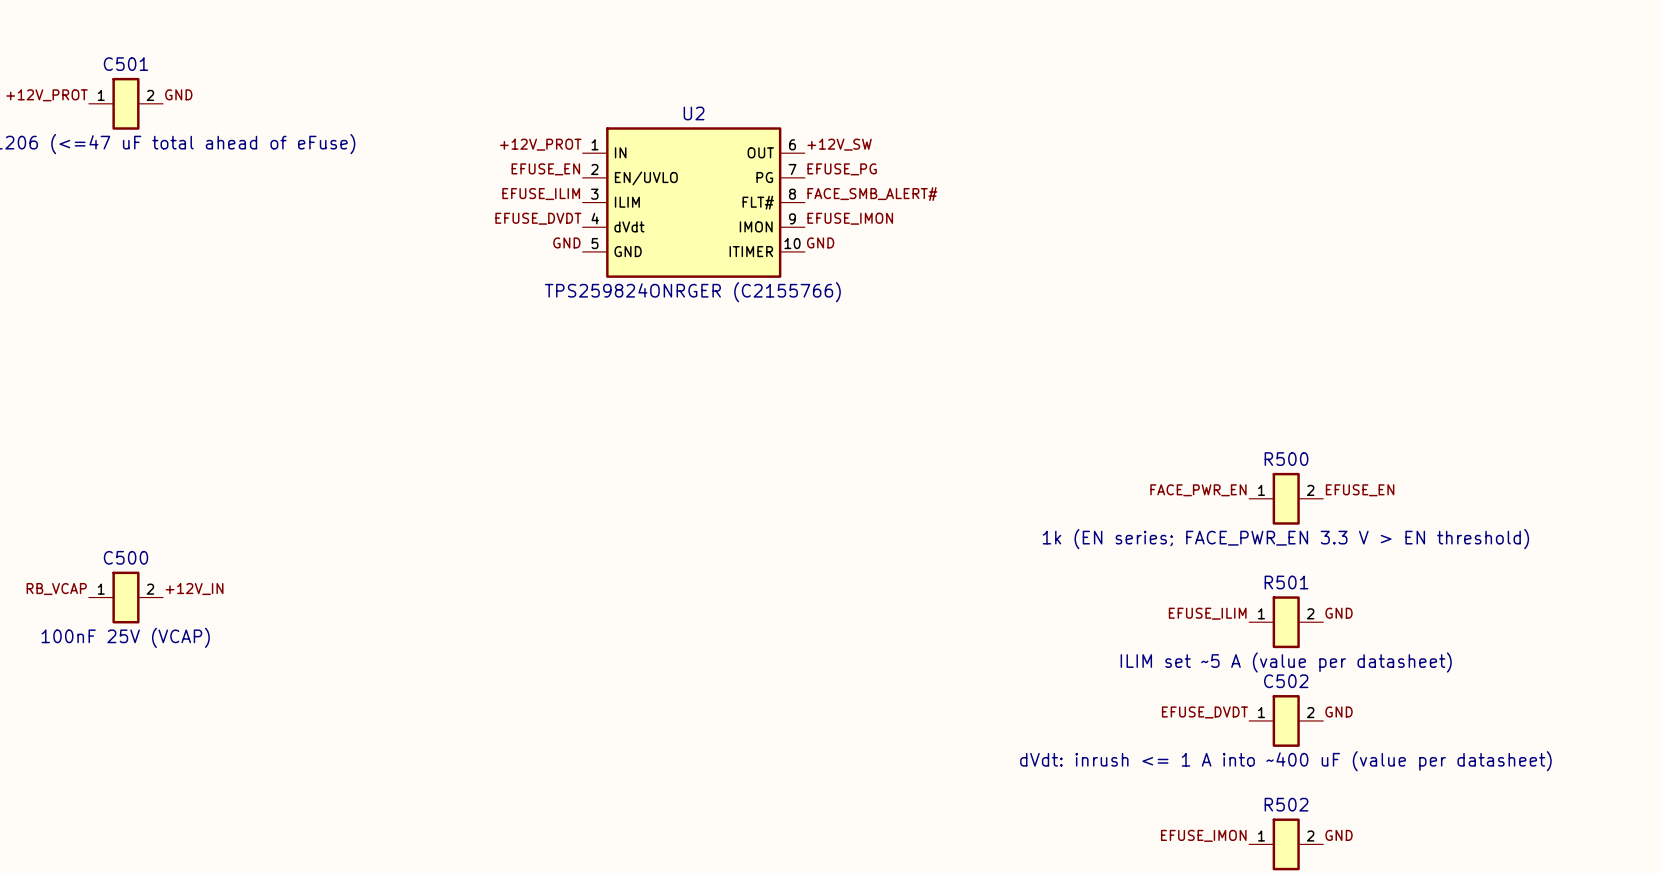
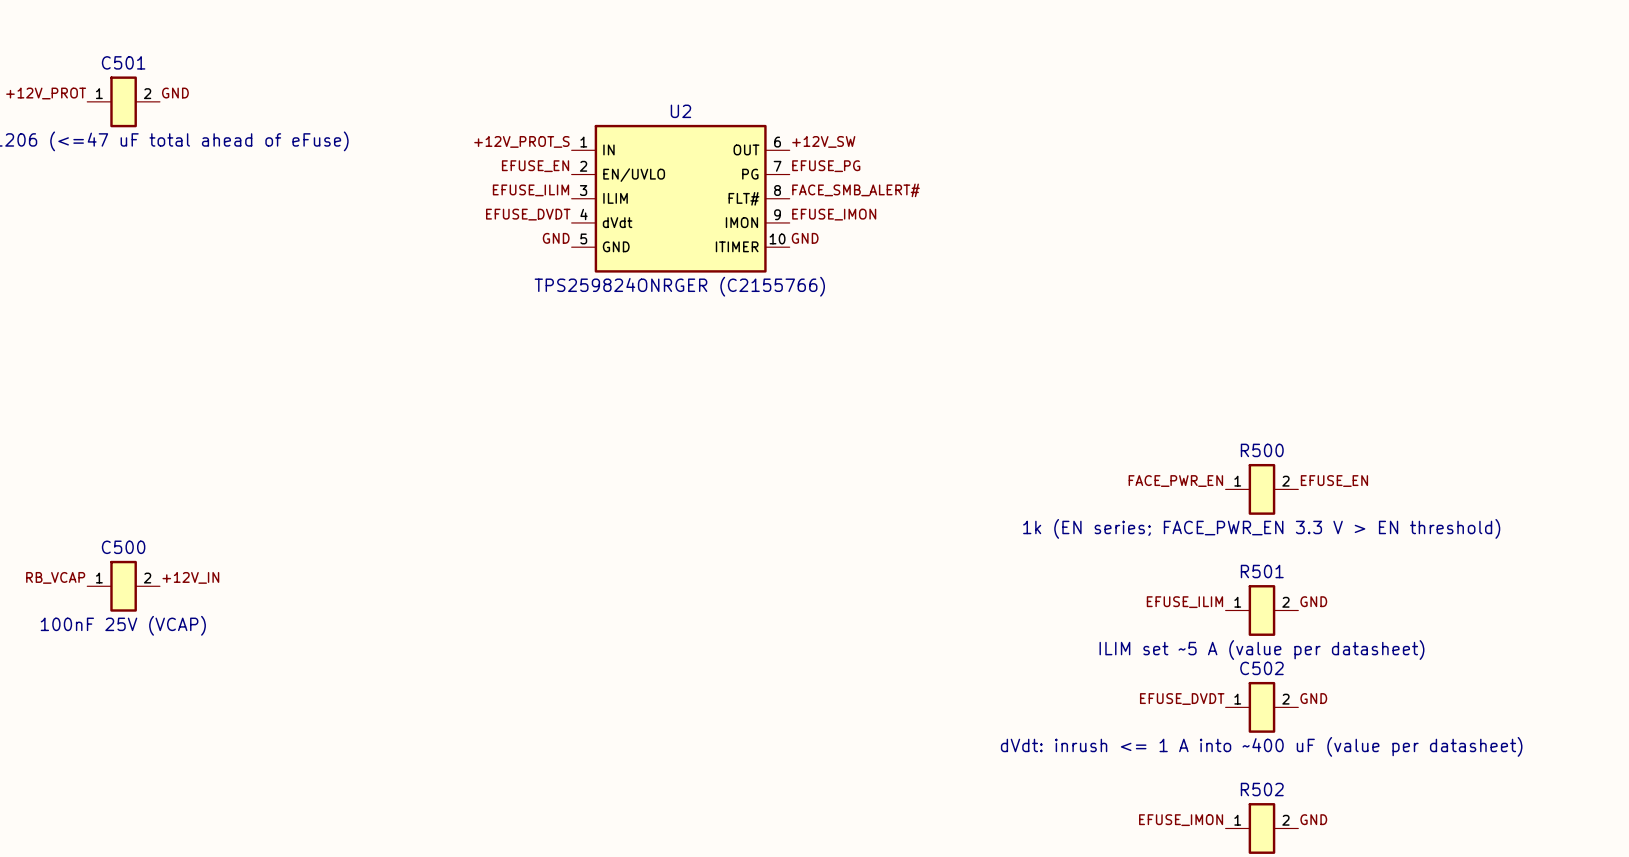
label: +12V_PROT (540, 144) -> +12V_PROT_S (521, 141)

